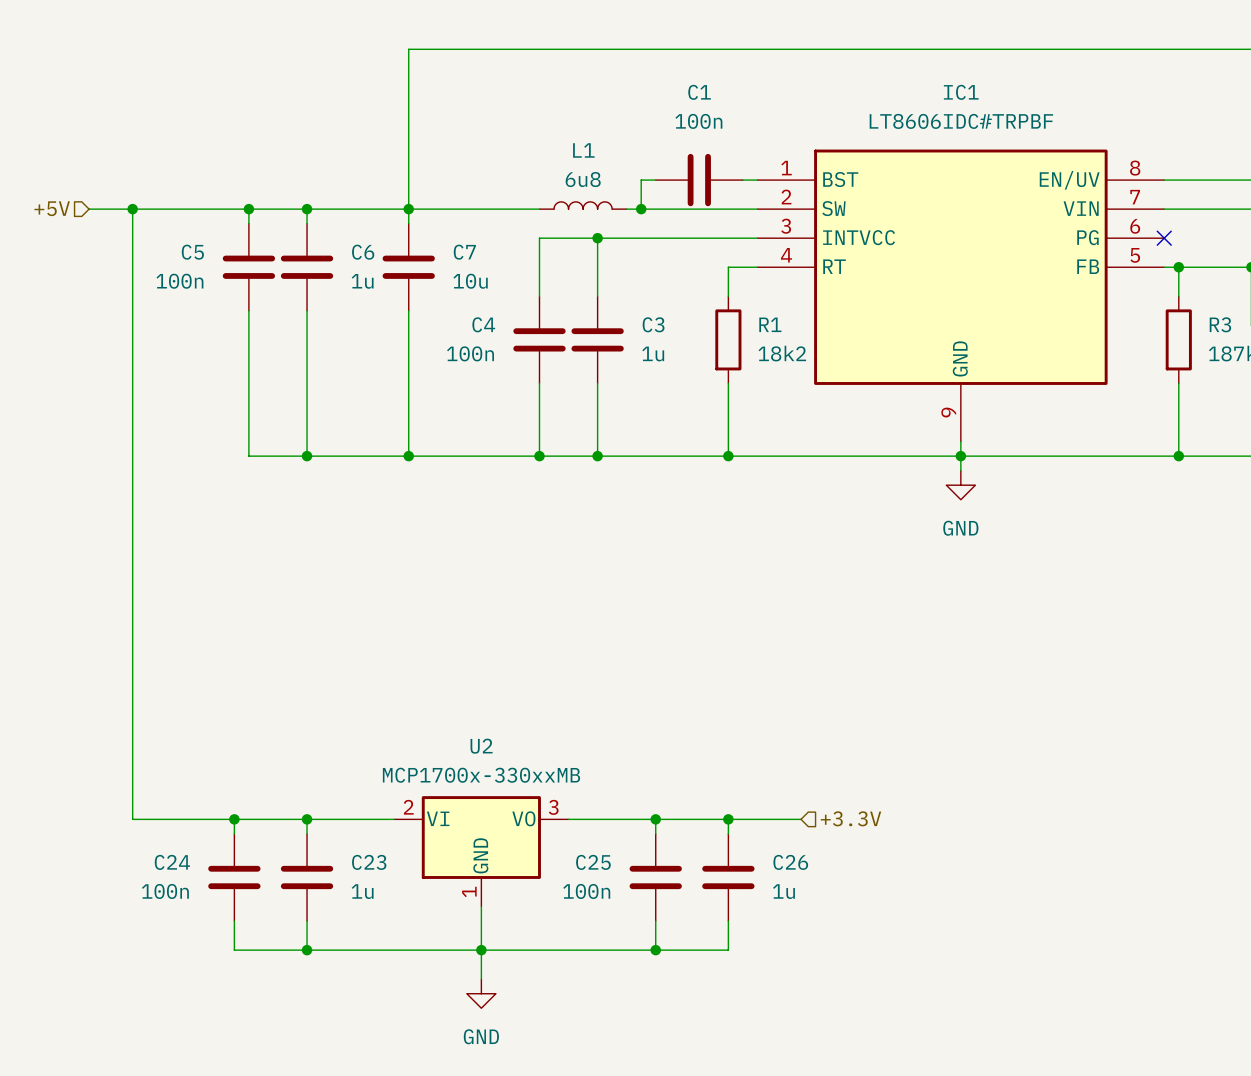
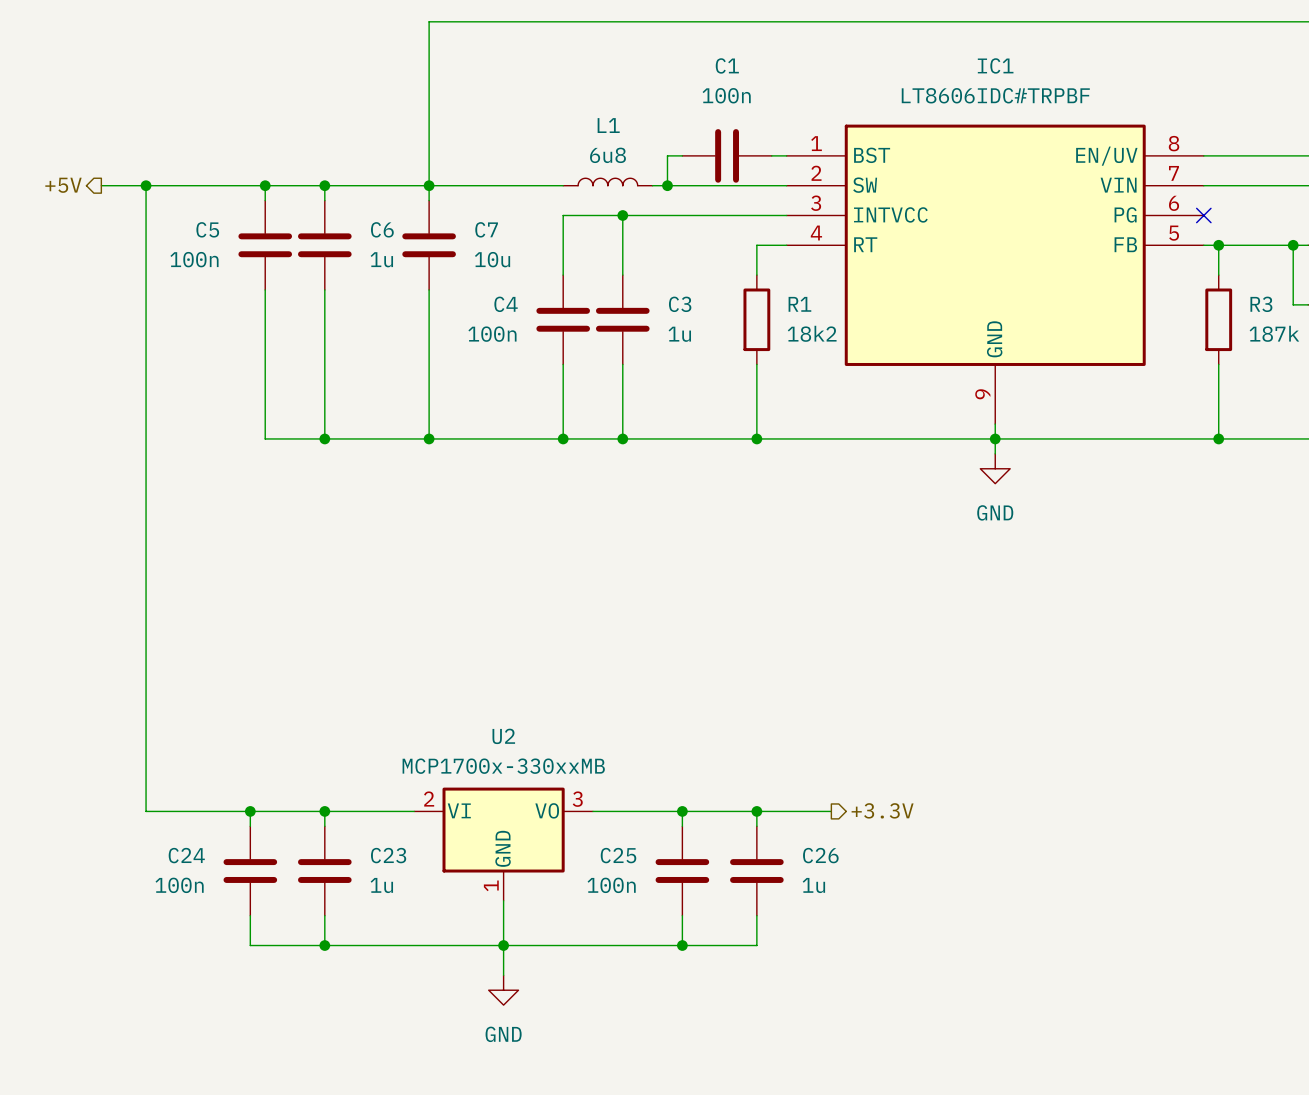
hierarchical label shape: input (52, 208) -> output (63, 185)
hierarchical label shape: input (850, 818) -> output (882, 810)

